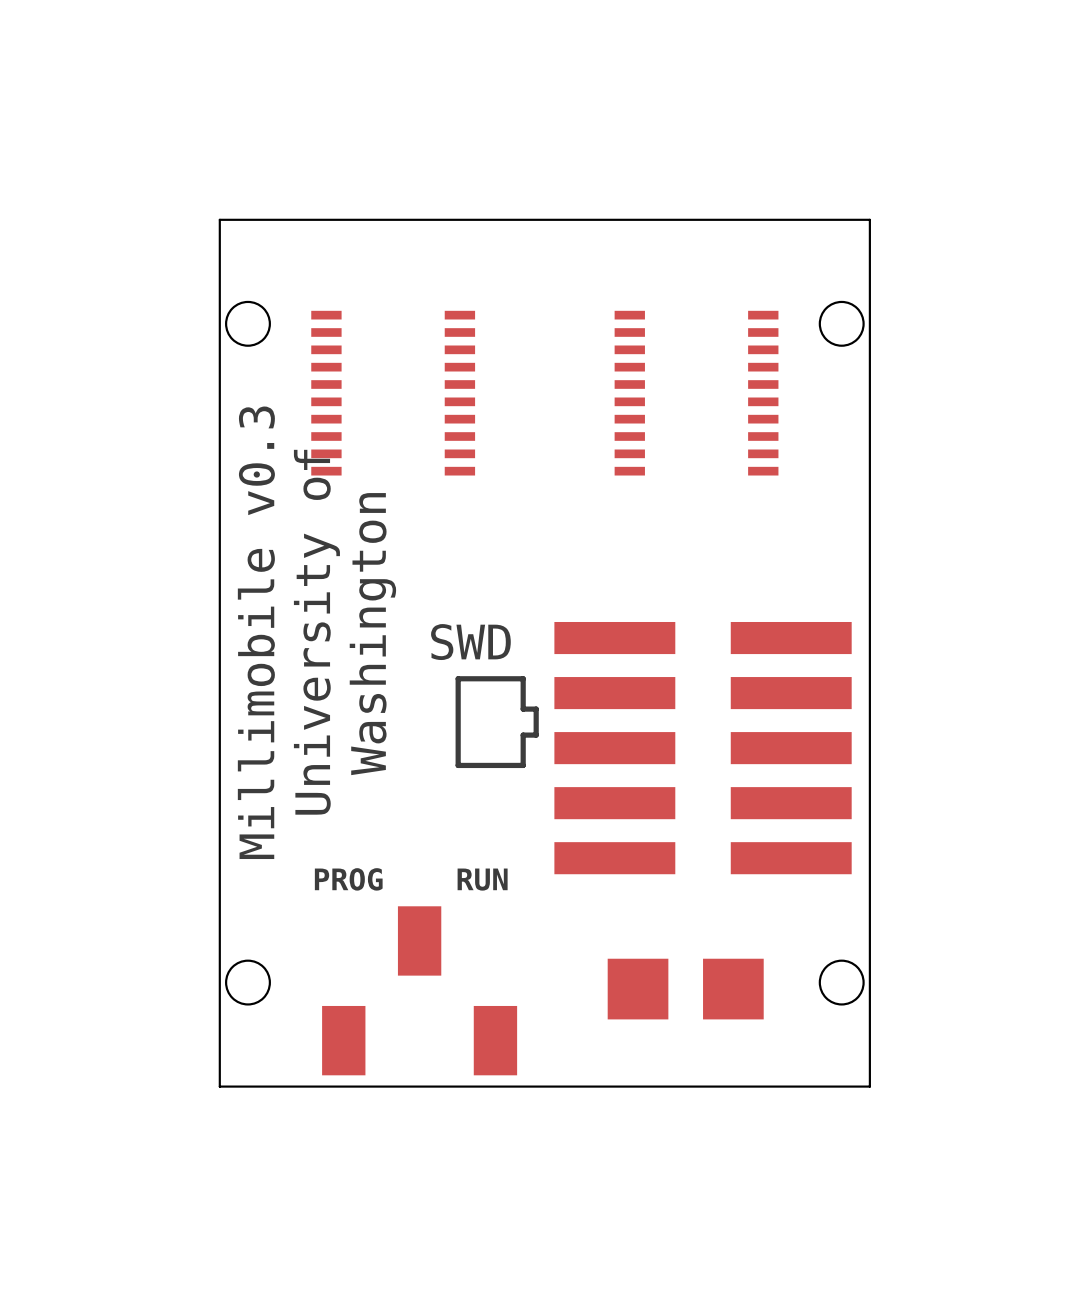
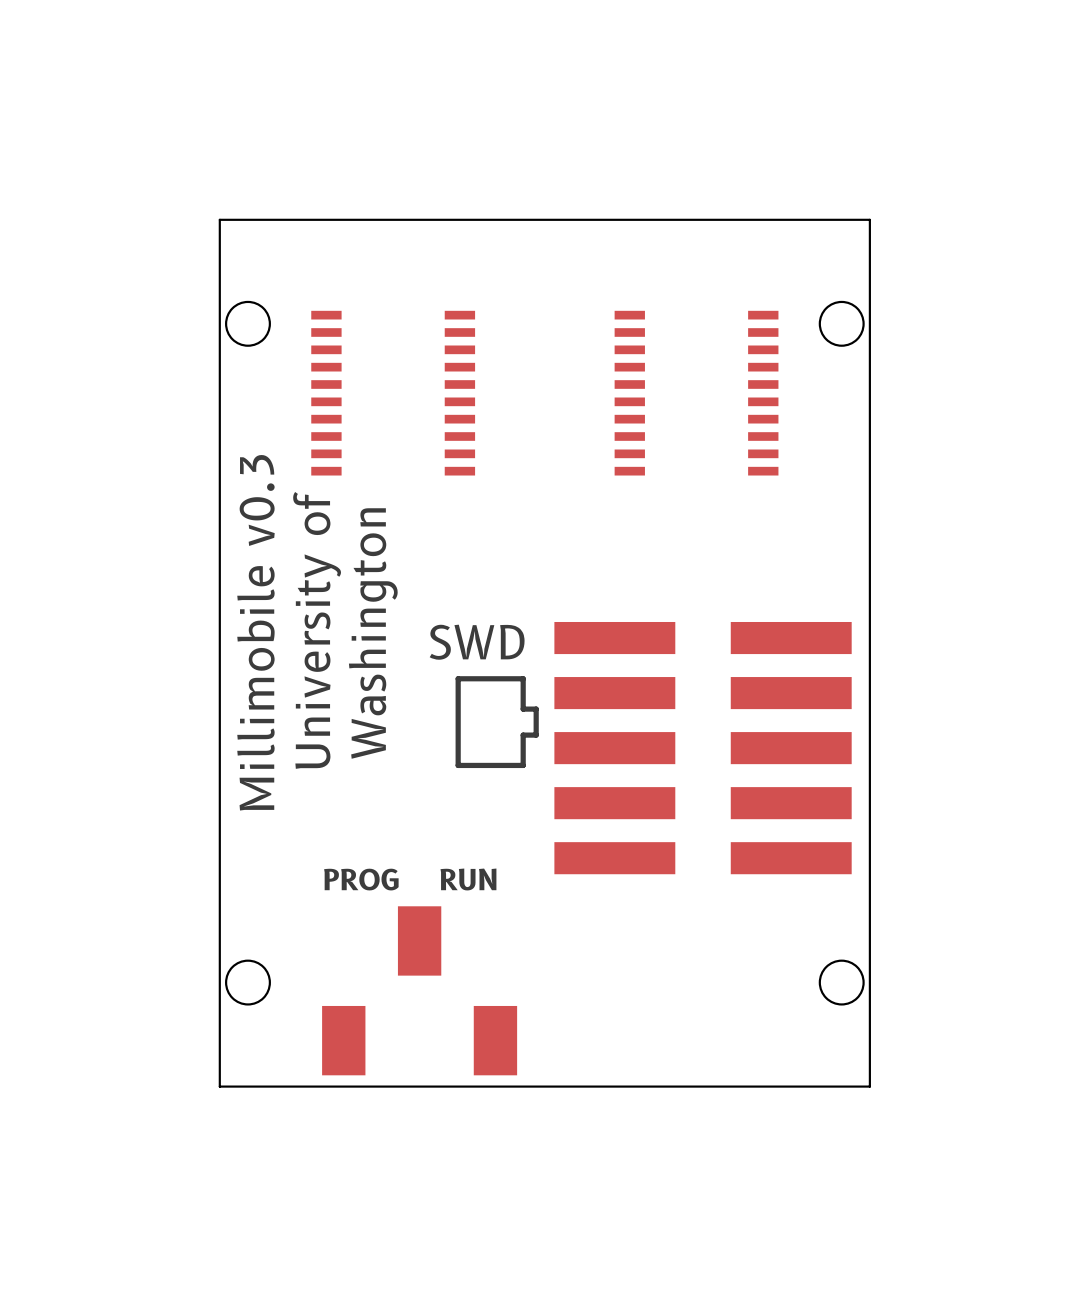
part: (685, 989) -> none

